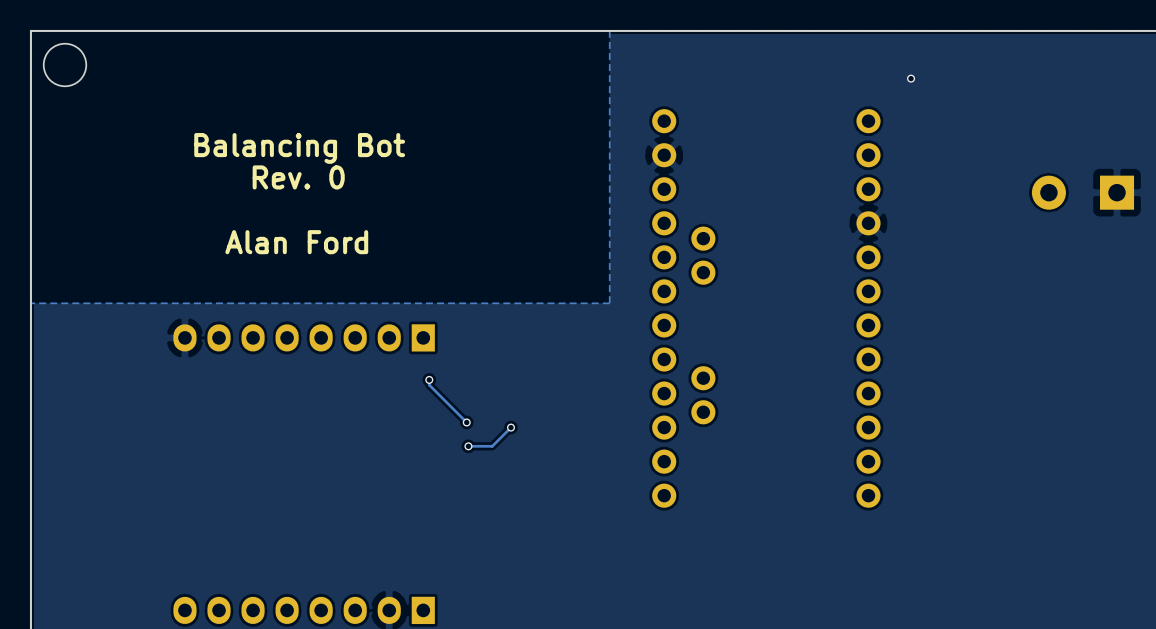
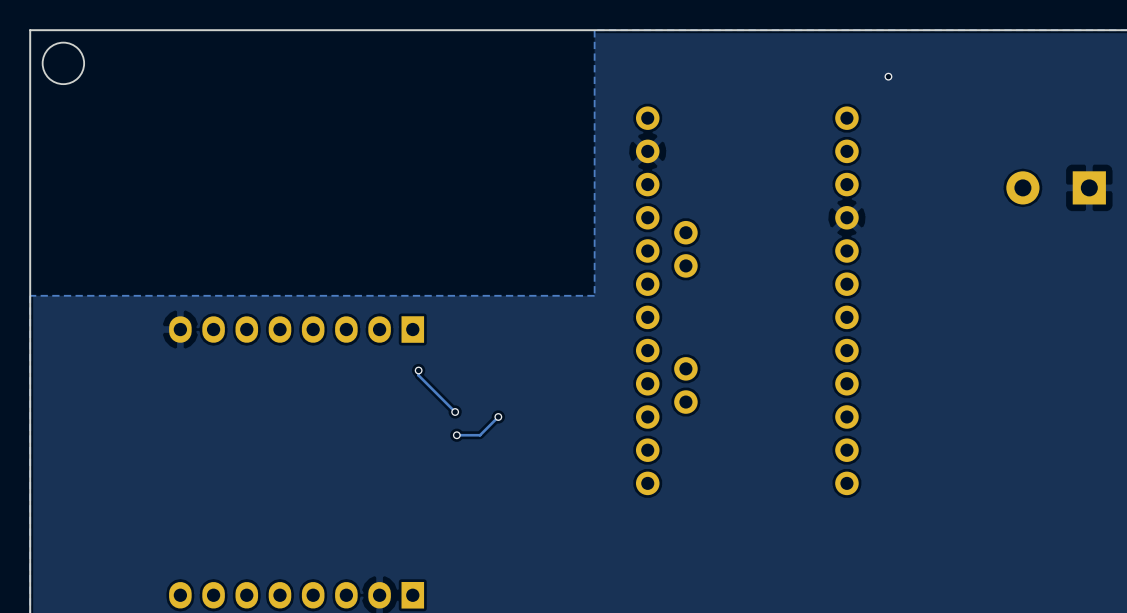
text: Balancing Bot (299, 148) -> none
text: Rev. 0 (298, 177) -> none
text: Alan Ford (296, 242) -> none

